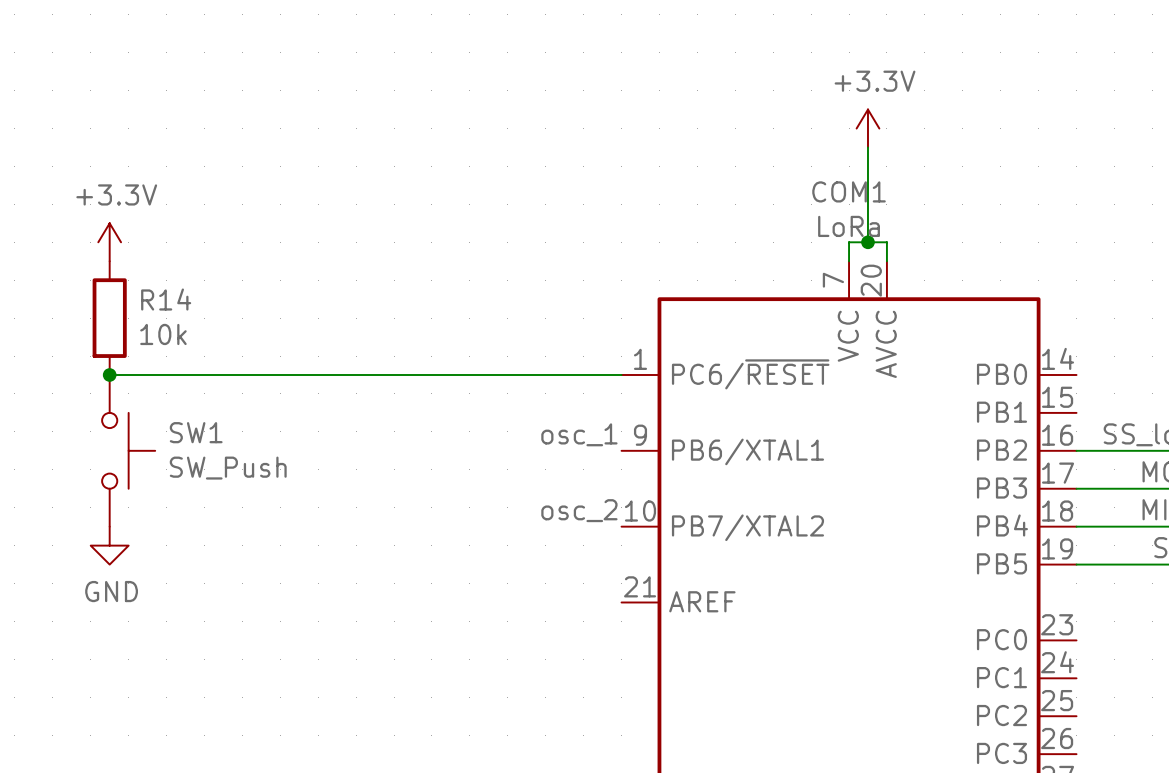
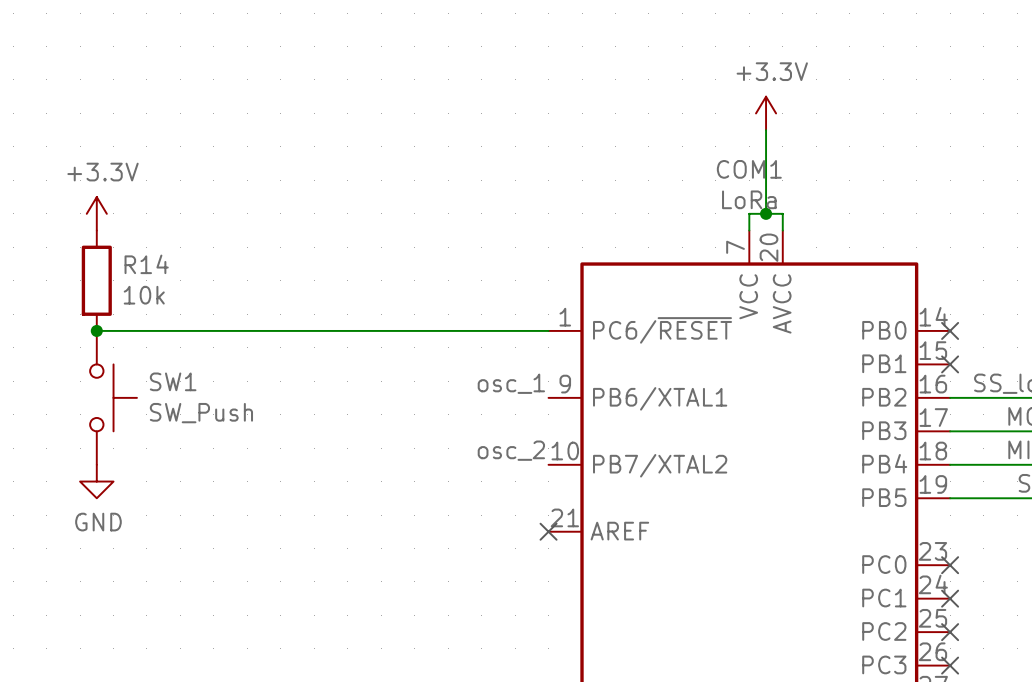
no-connect mark: none -> (950, 330)
no-connect mark: none -> (950, 364)
no-connect mark: none -> (548, 531)
no-connect mark: none -> (950, 565)
no-connect mark: none -> (950, 598)
no-connect mark: none -> (950, 632)
no-connect mark: none -> (950, 665)

